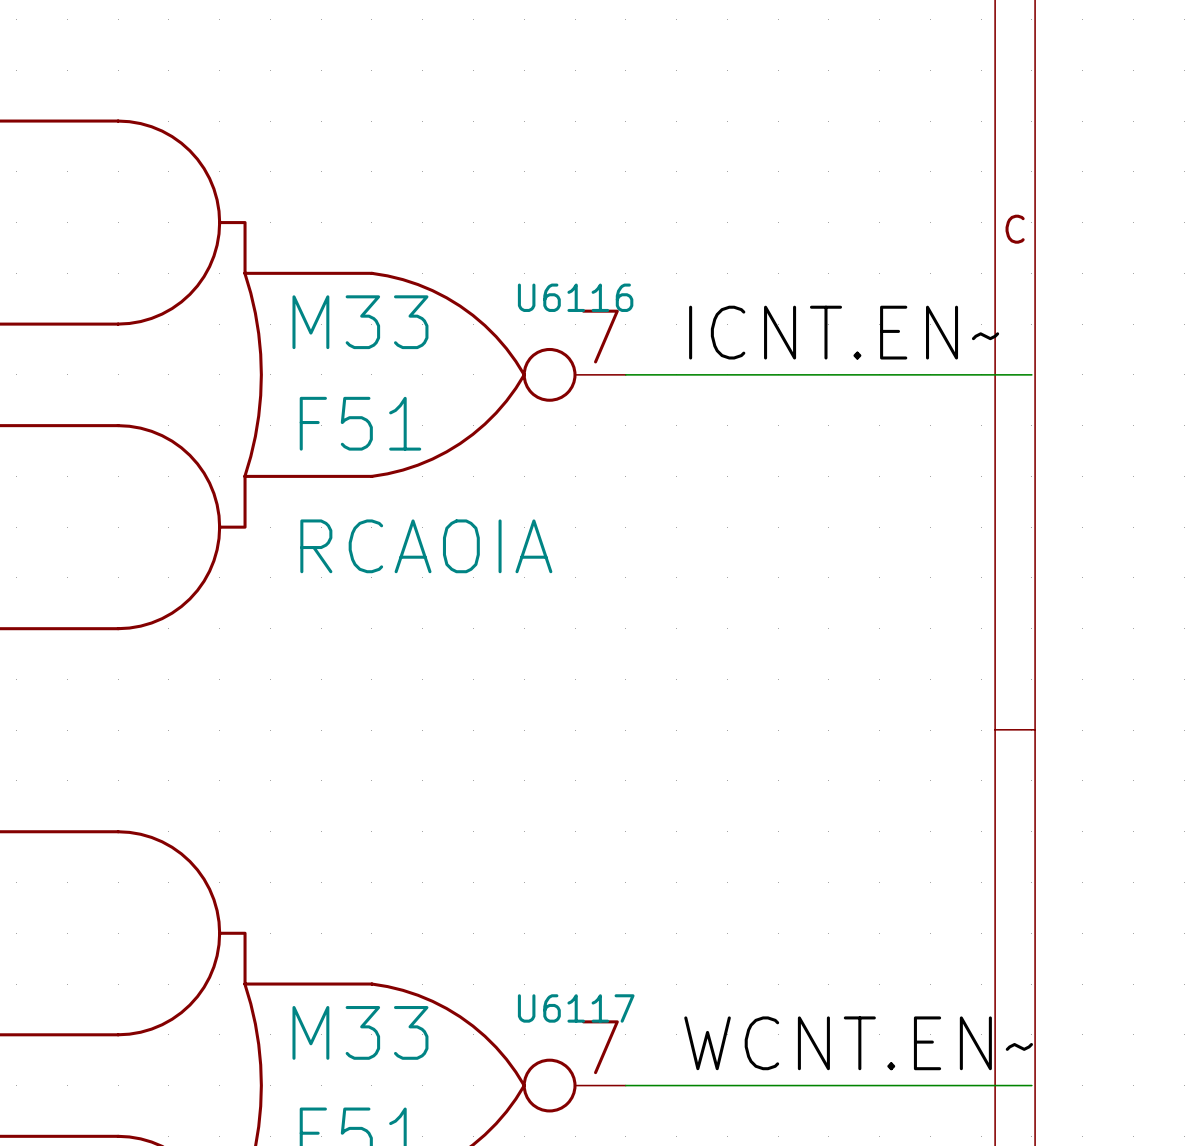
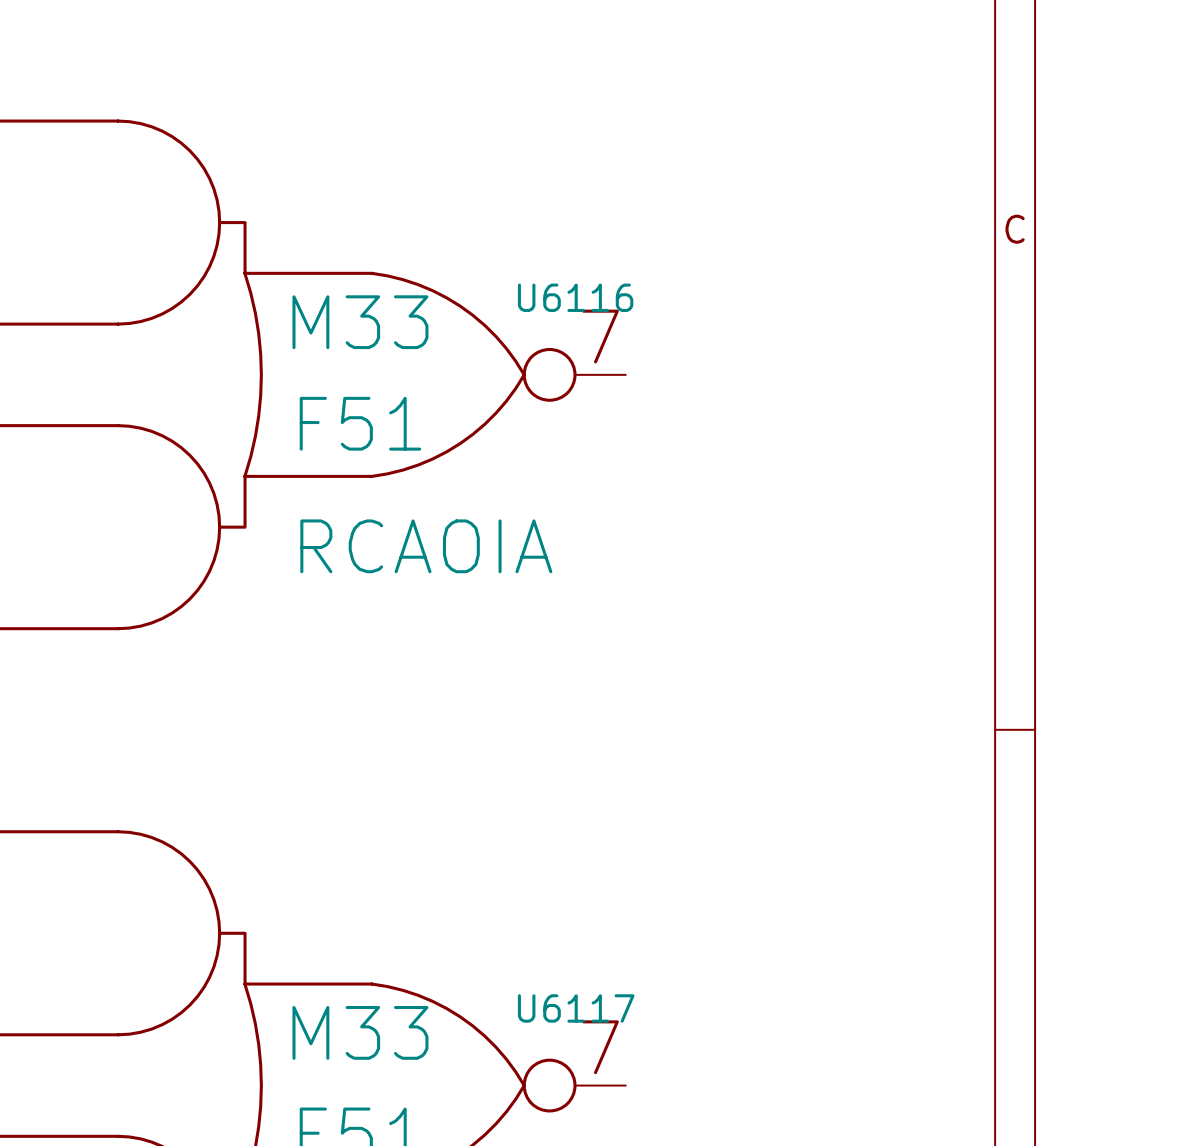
label: ICNT.EN~ (844, 332) -> none
wire: (625, 374) (1031, 374) -> none
label: WCNT.EN~ (858, 1043) -> none
wire: (625, 1085) (1031, 1085) -> none

